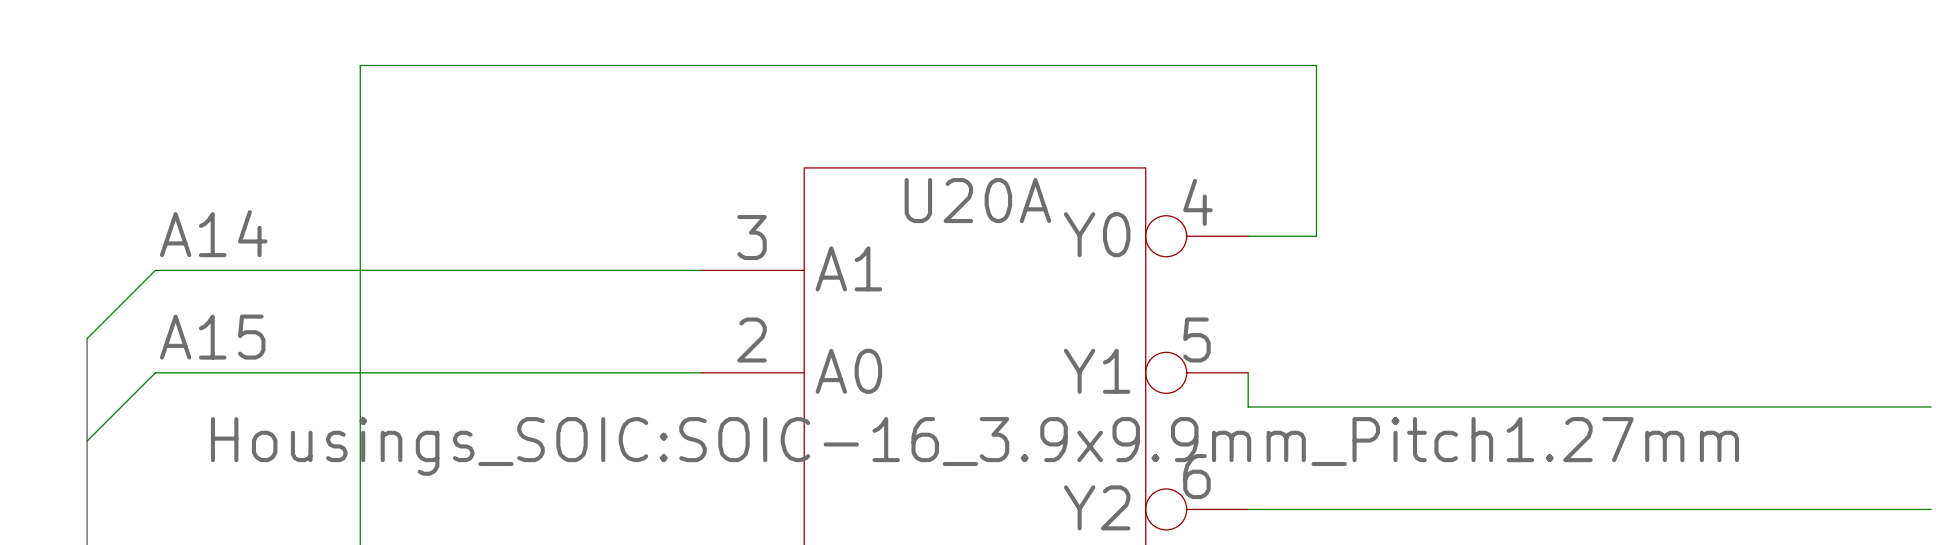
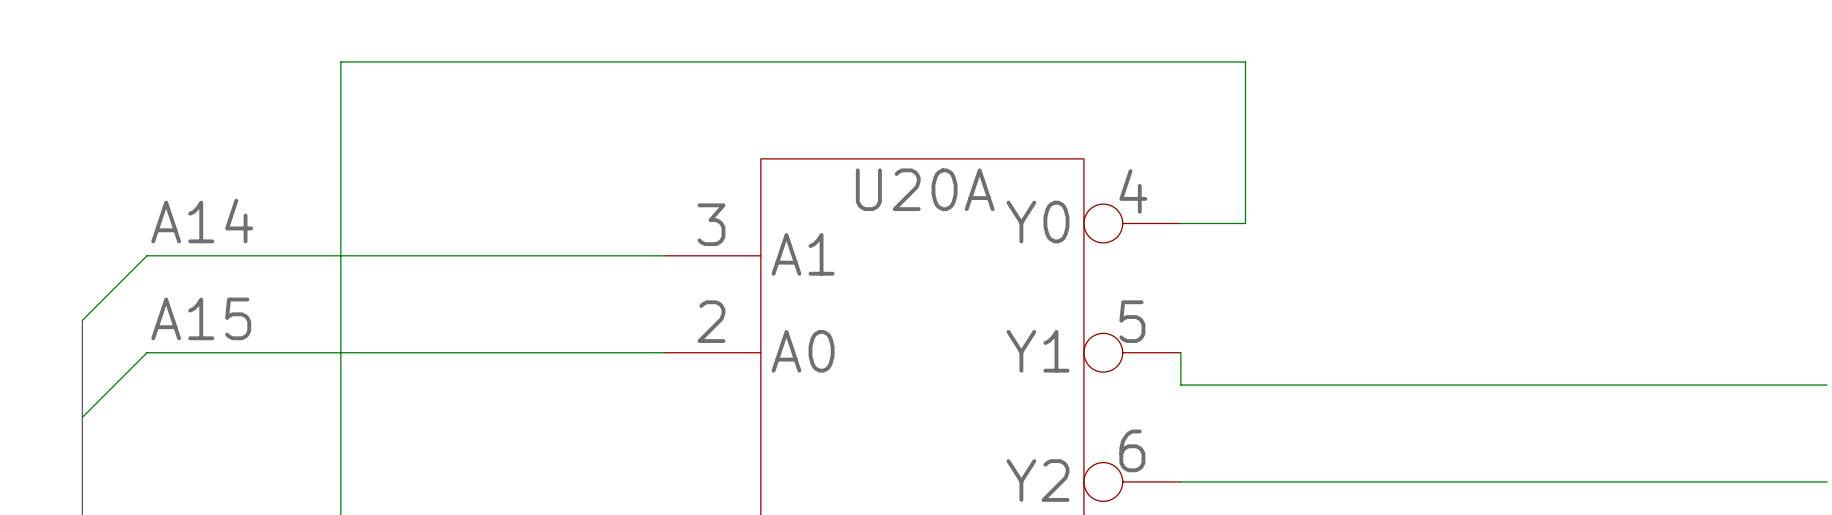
U20A text: Housings_SOIC:SOIC-16_3.9x9.9mm_Pitch1.27mm (974, 446) -> none

